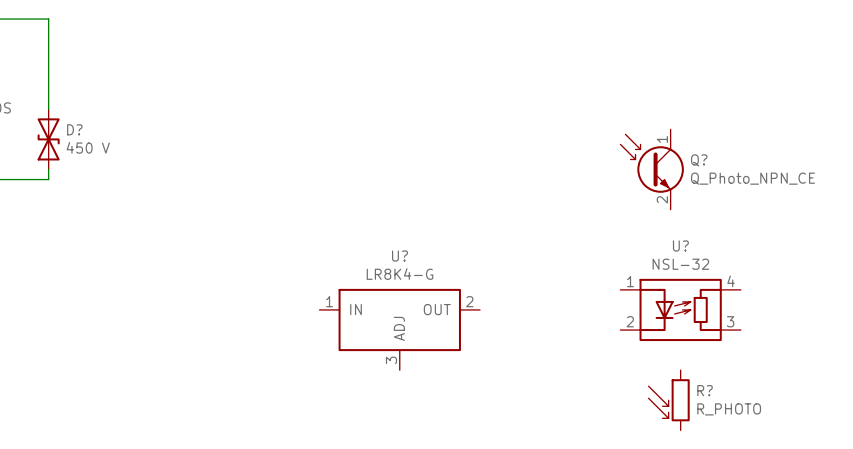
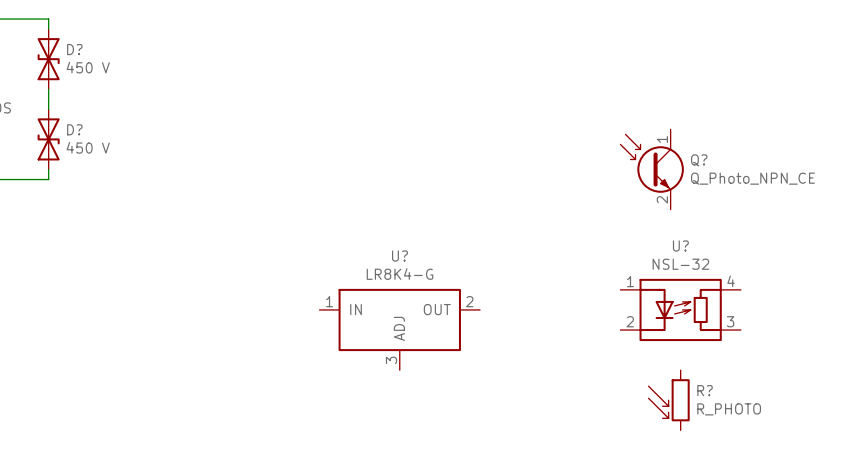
D?: none -> 450 V (48, 59)

